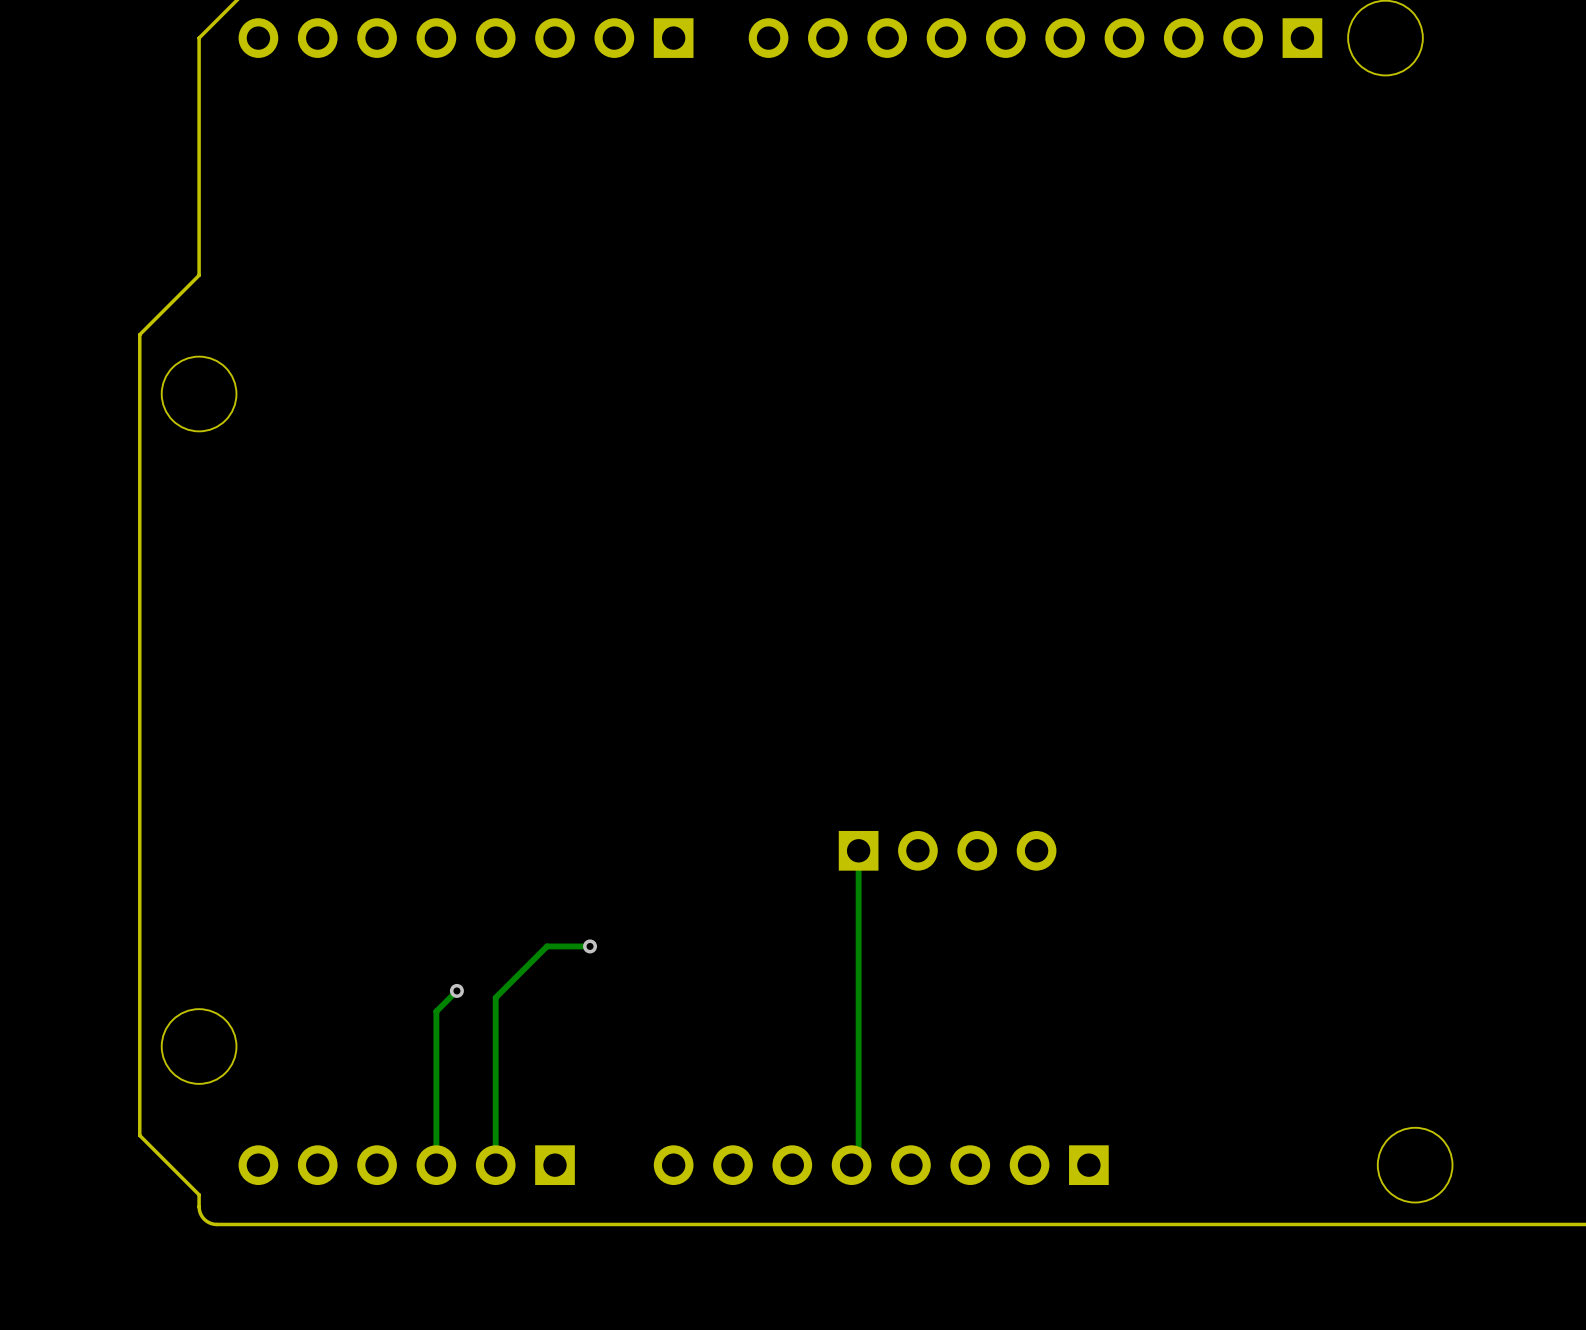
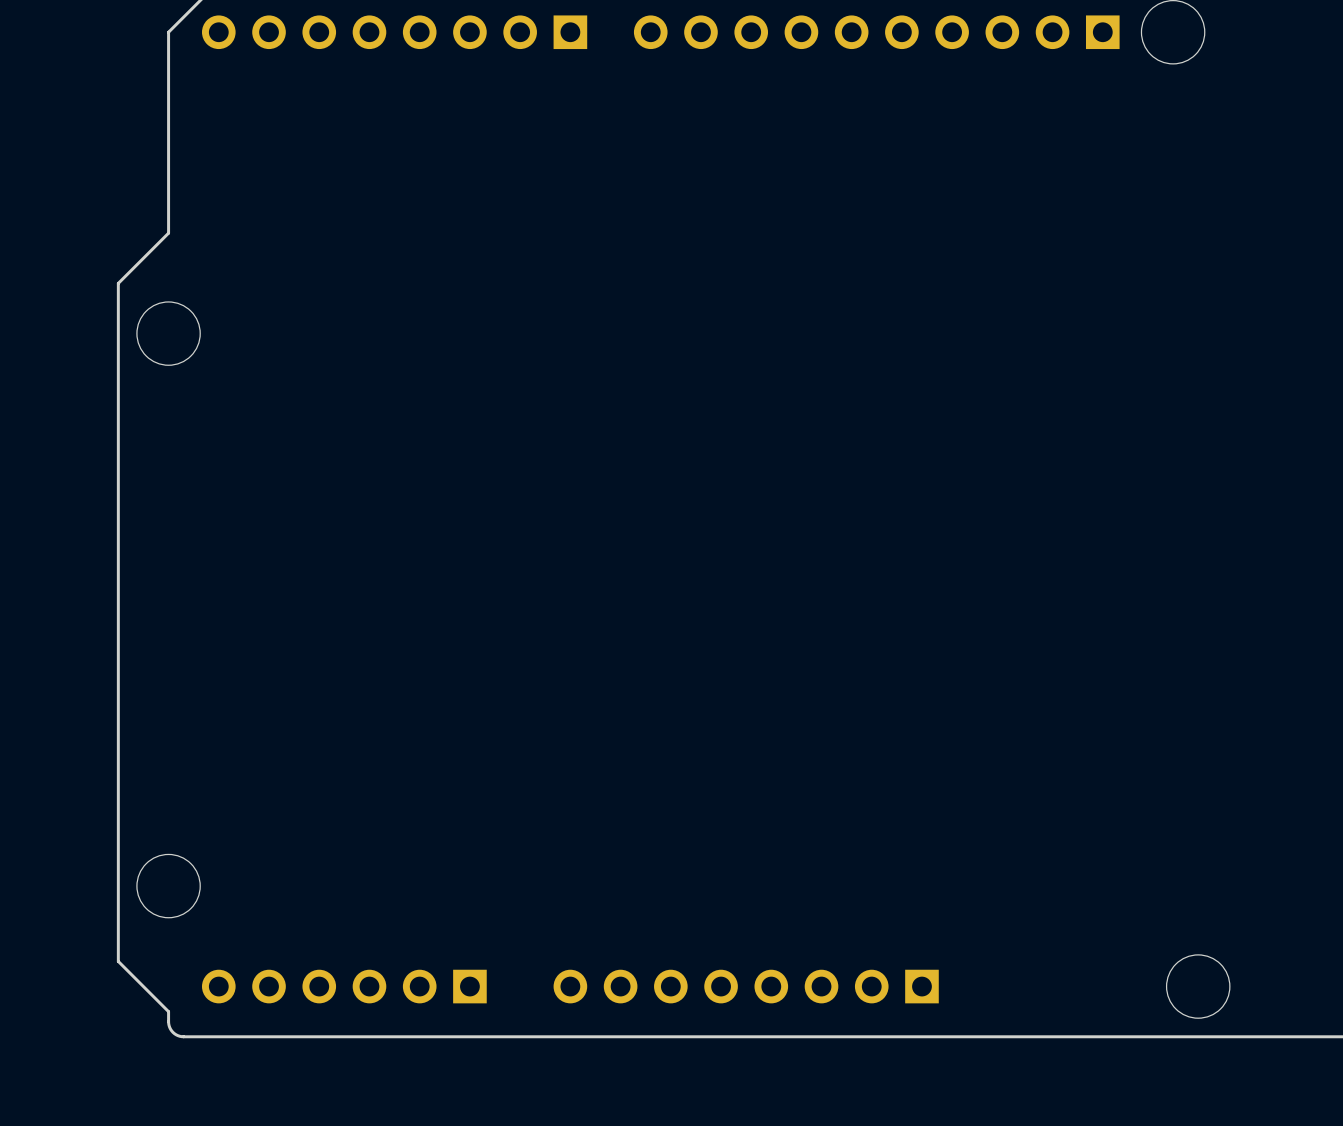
track: (858, 850) (858, 1158) (851, 1165) -> none
part: (947, 850) -> none
track: (590, 946) (546, 946) (495, 997) (495, 1165) -> none
via: (590, 946) -> none
track: (456, 990) (436, 1011) (436, 1165) -> none
via: (456, 990) -> none

